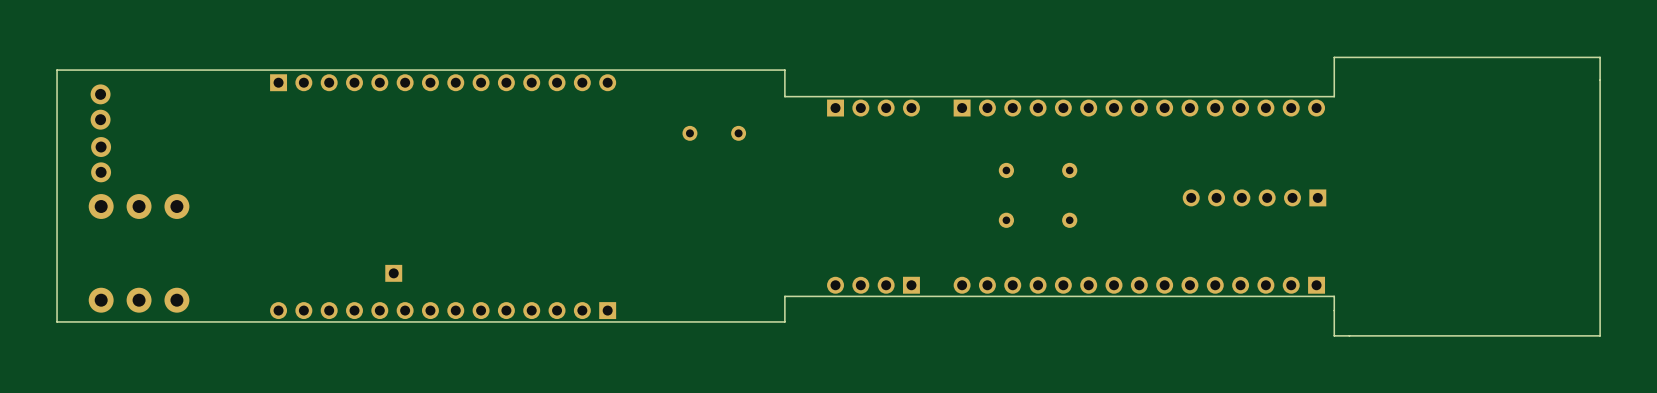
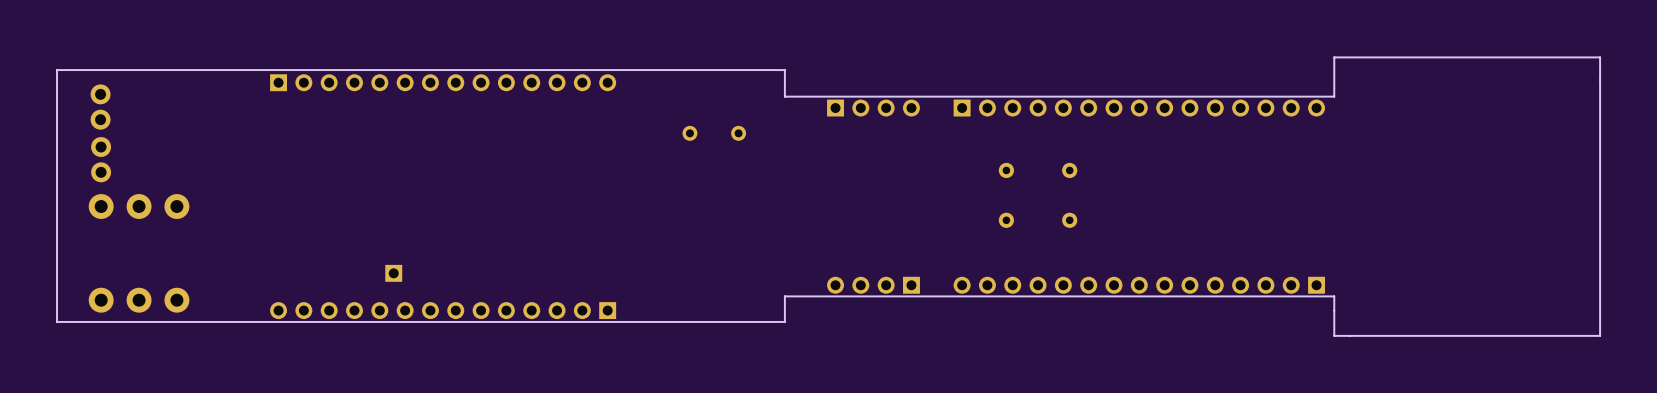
part: (1254, 197) -> none

